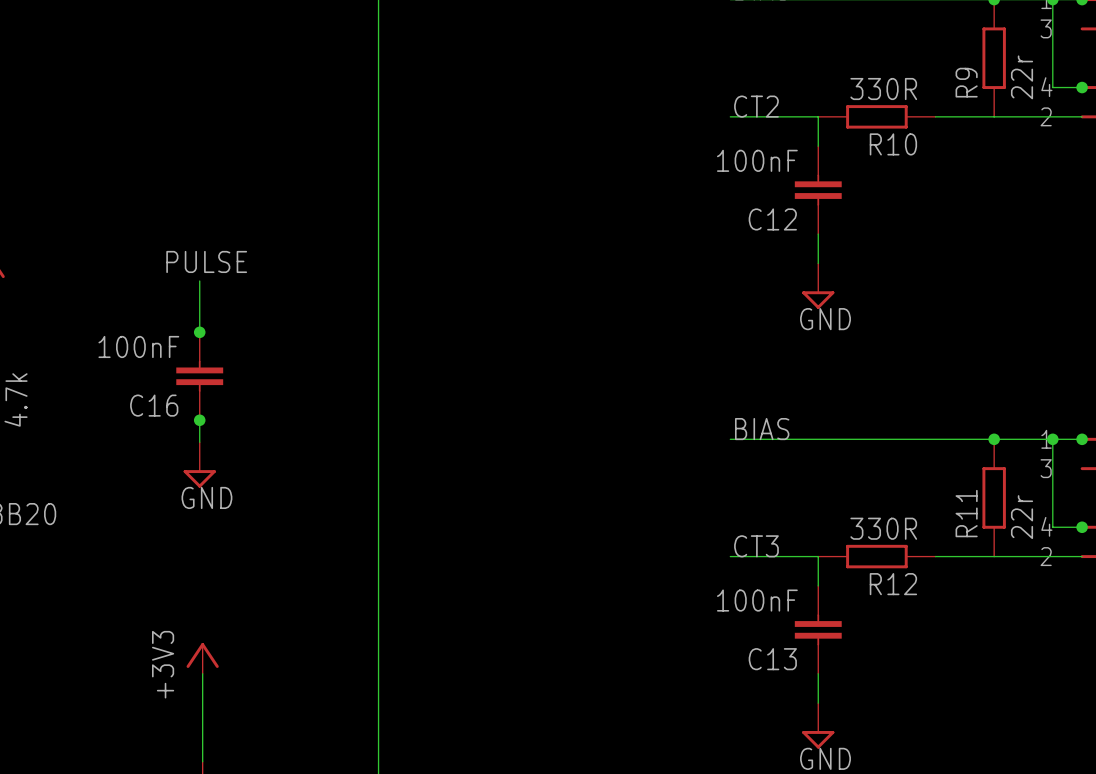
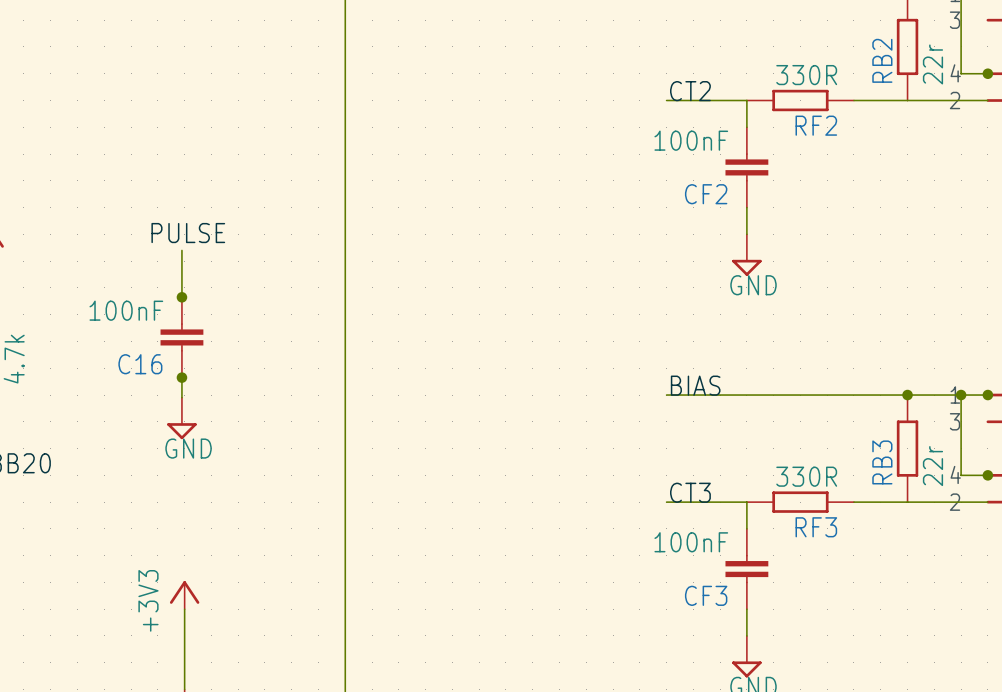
R9 name: R9 (966, 82) -> RB2 (882, 60)
R10 name: R10 (893, 144) -> RF2 (816, 125)
C12 name: C12 (772, 219) -> CF2 (706, 194)
R11 name: R11 (966, 513) -> RB3 (882, 462)
R12 name: R12 (893, 584) -> RF3 (816, 527)
C13 name: C13 (772, 659) -> CF3 (706, 595)

